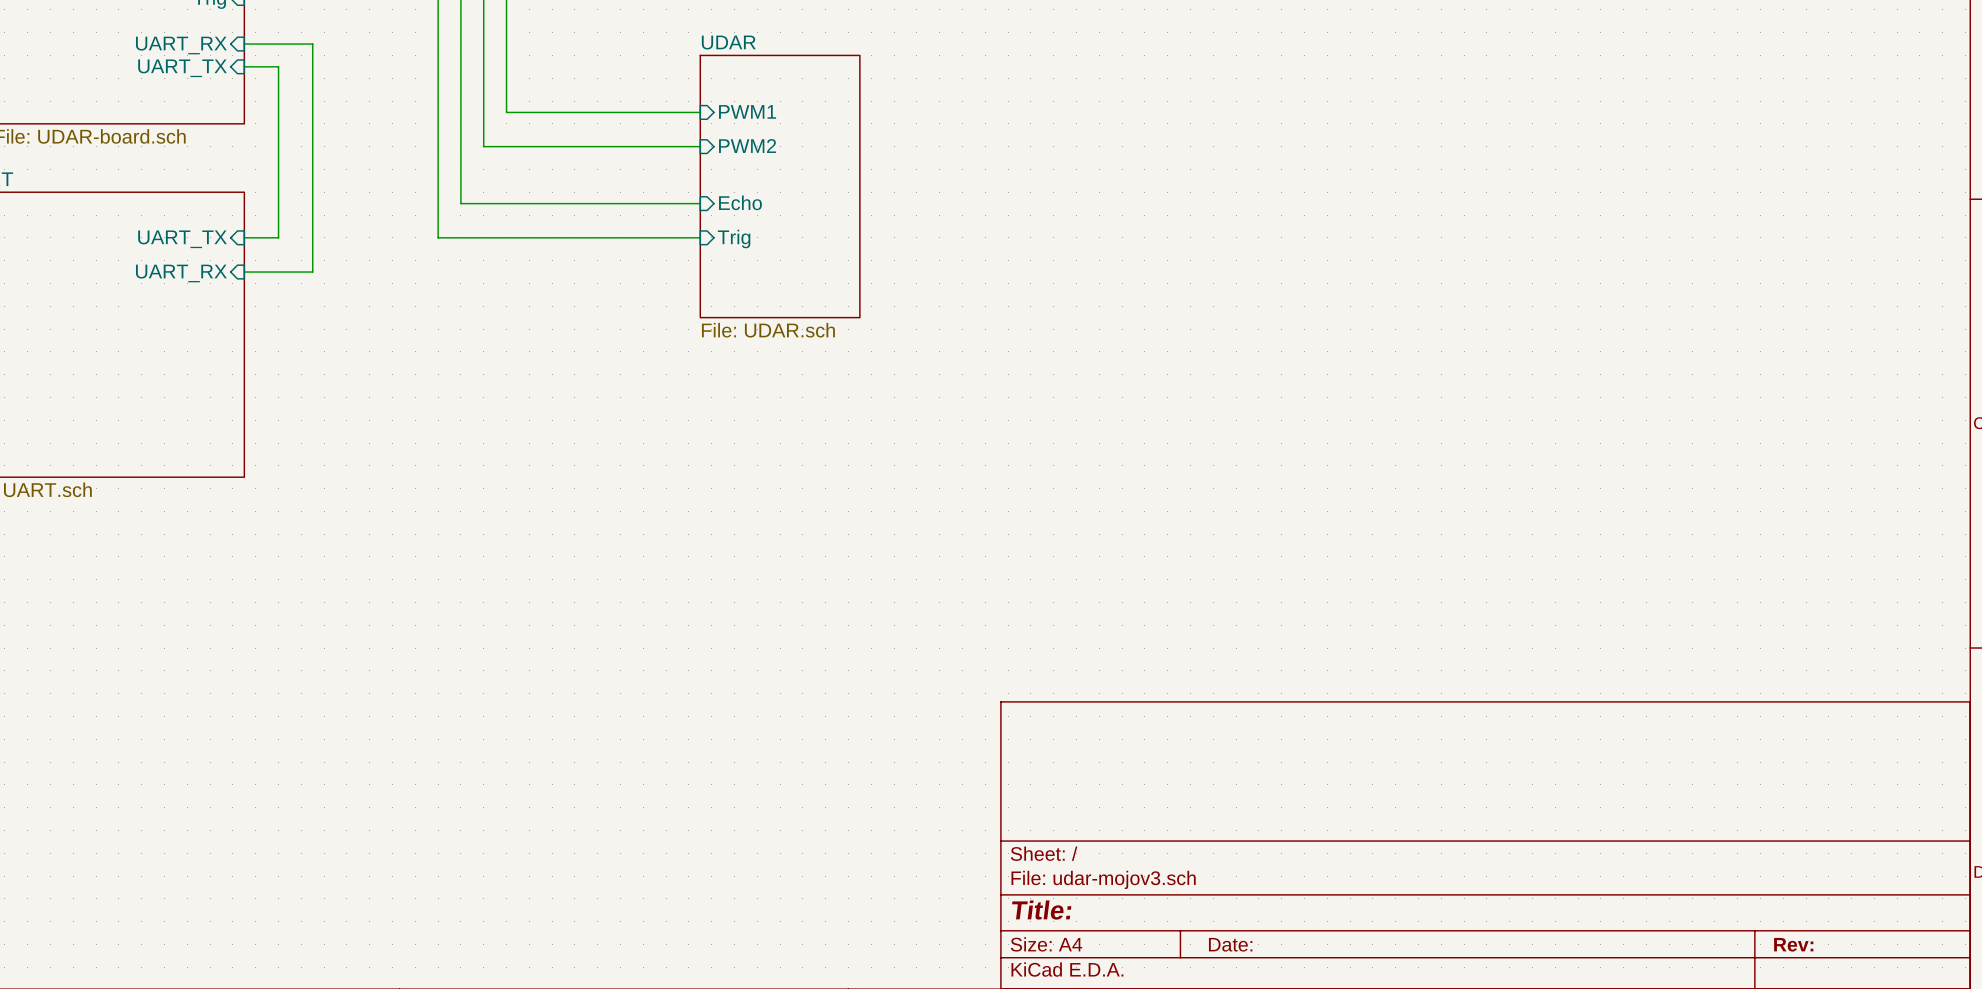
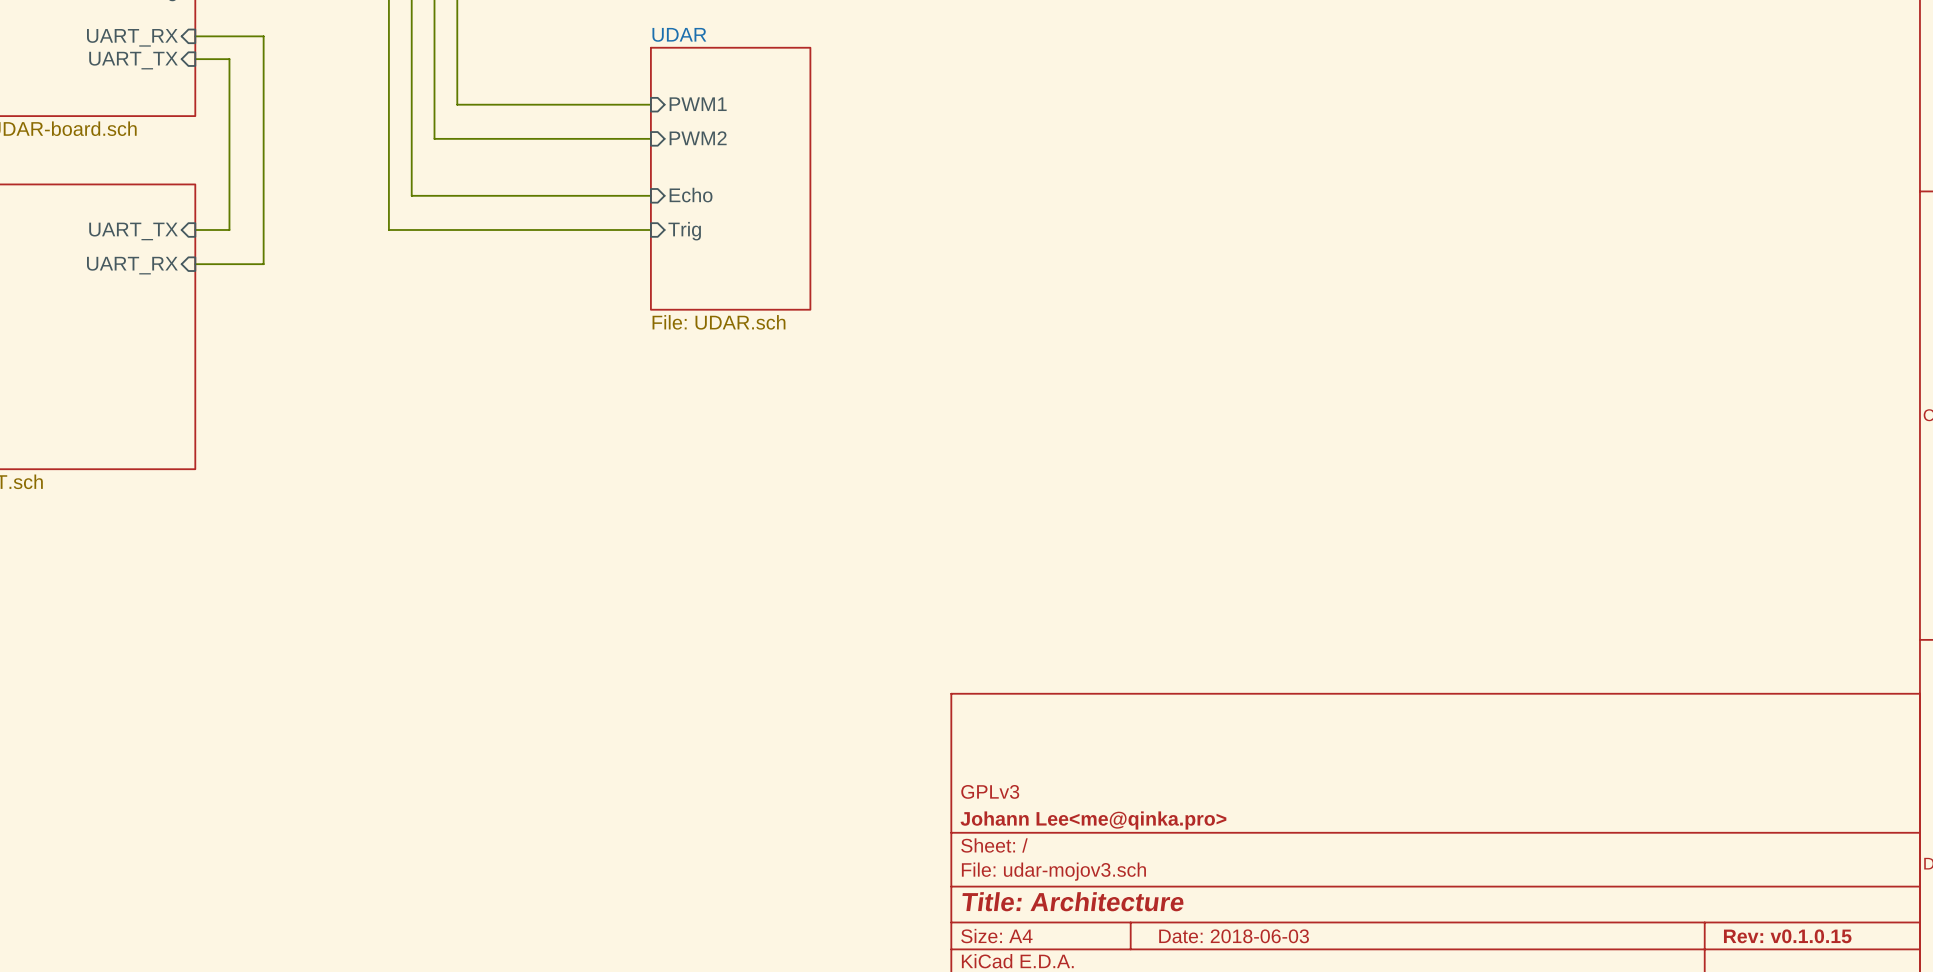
title block: none -> GPLv3 (990, 791)
title block: none -> Johann Lee<me@qinka.pro> (1093, 820)
title block: Title: (1041, 910) -> Title: Architecture (1073, 901)
title block: Date: (1230, 944) -> Date: 2018-06-03 (1234, 936)
title block: Rev: (1793, 944) -> Rev: v0.1.0.15 (1787, 936)

